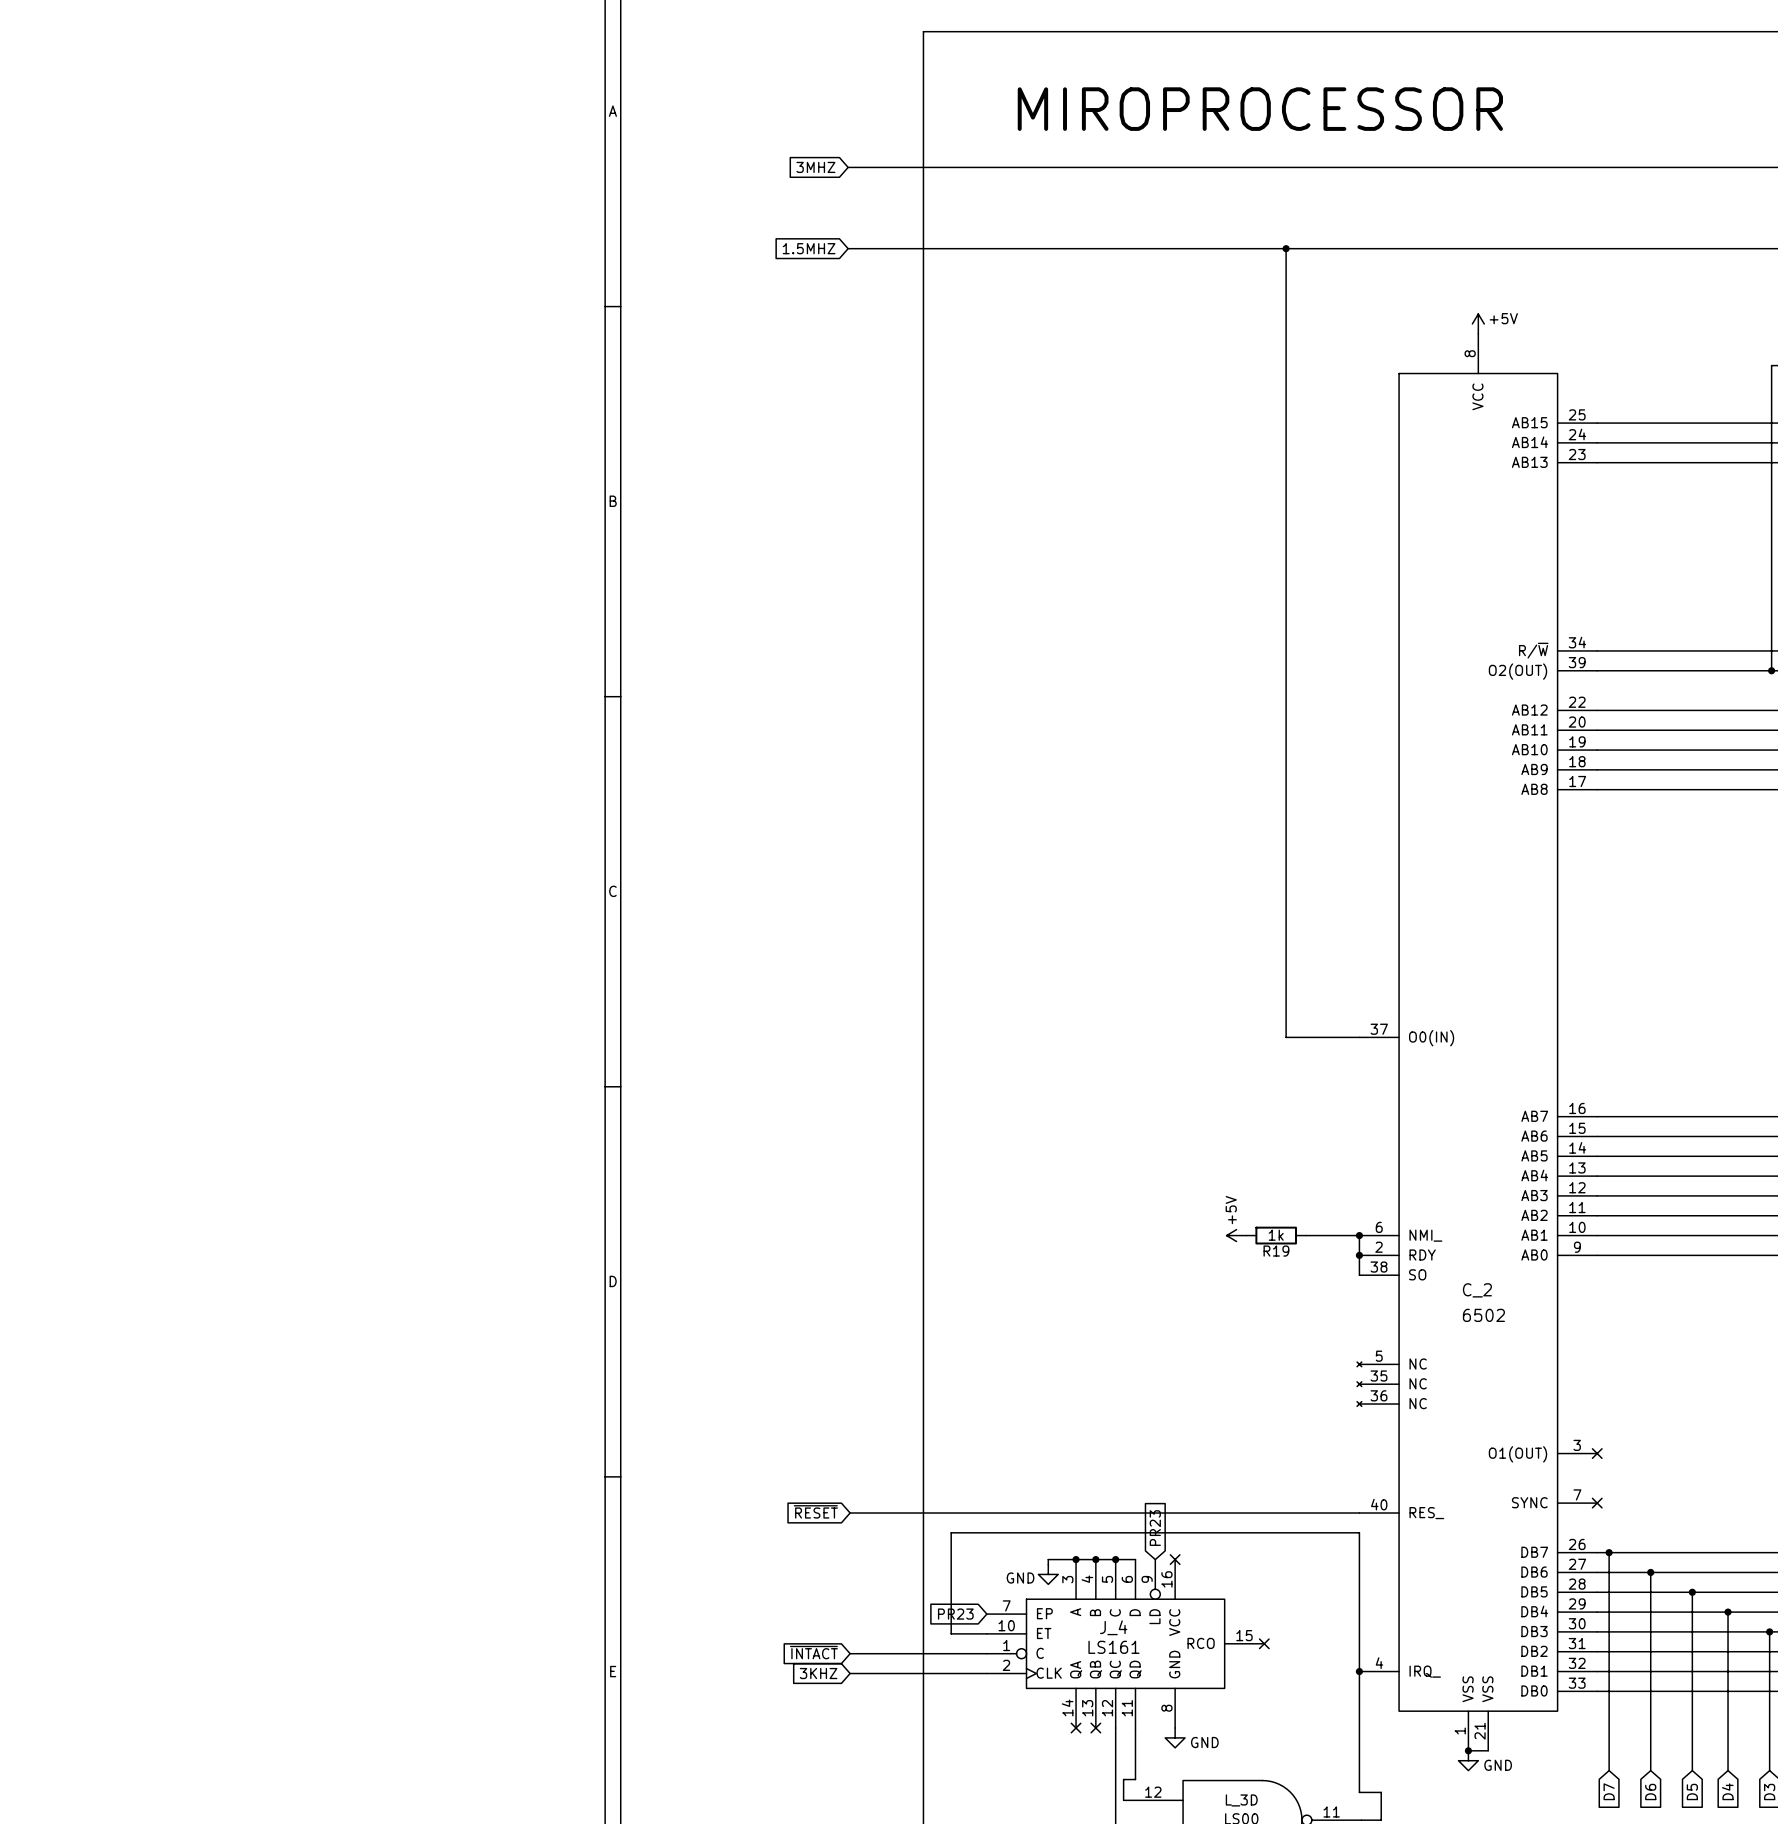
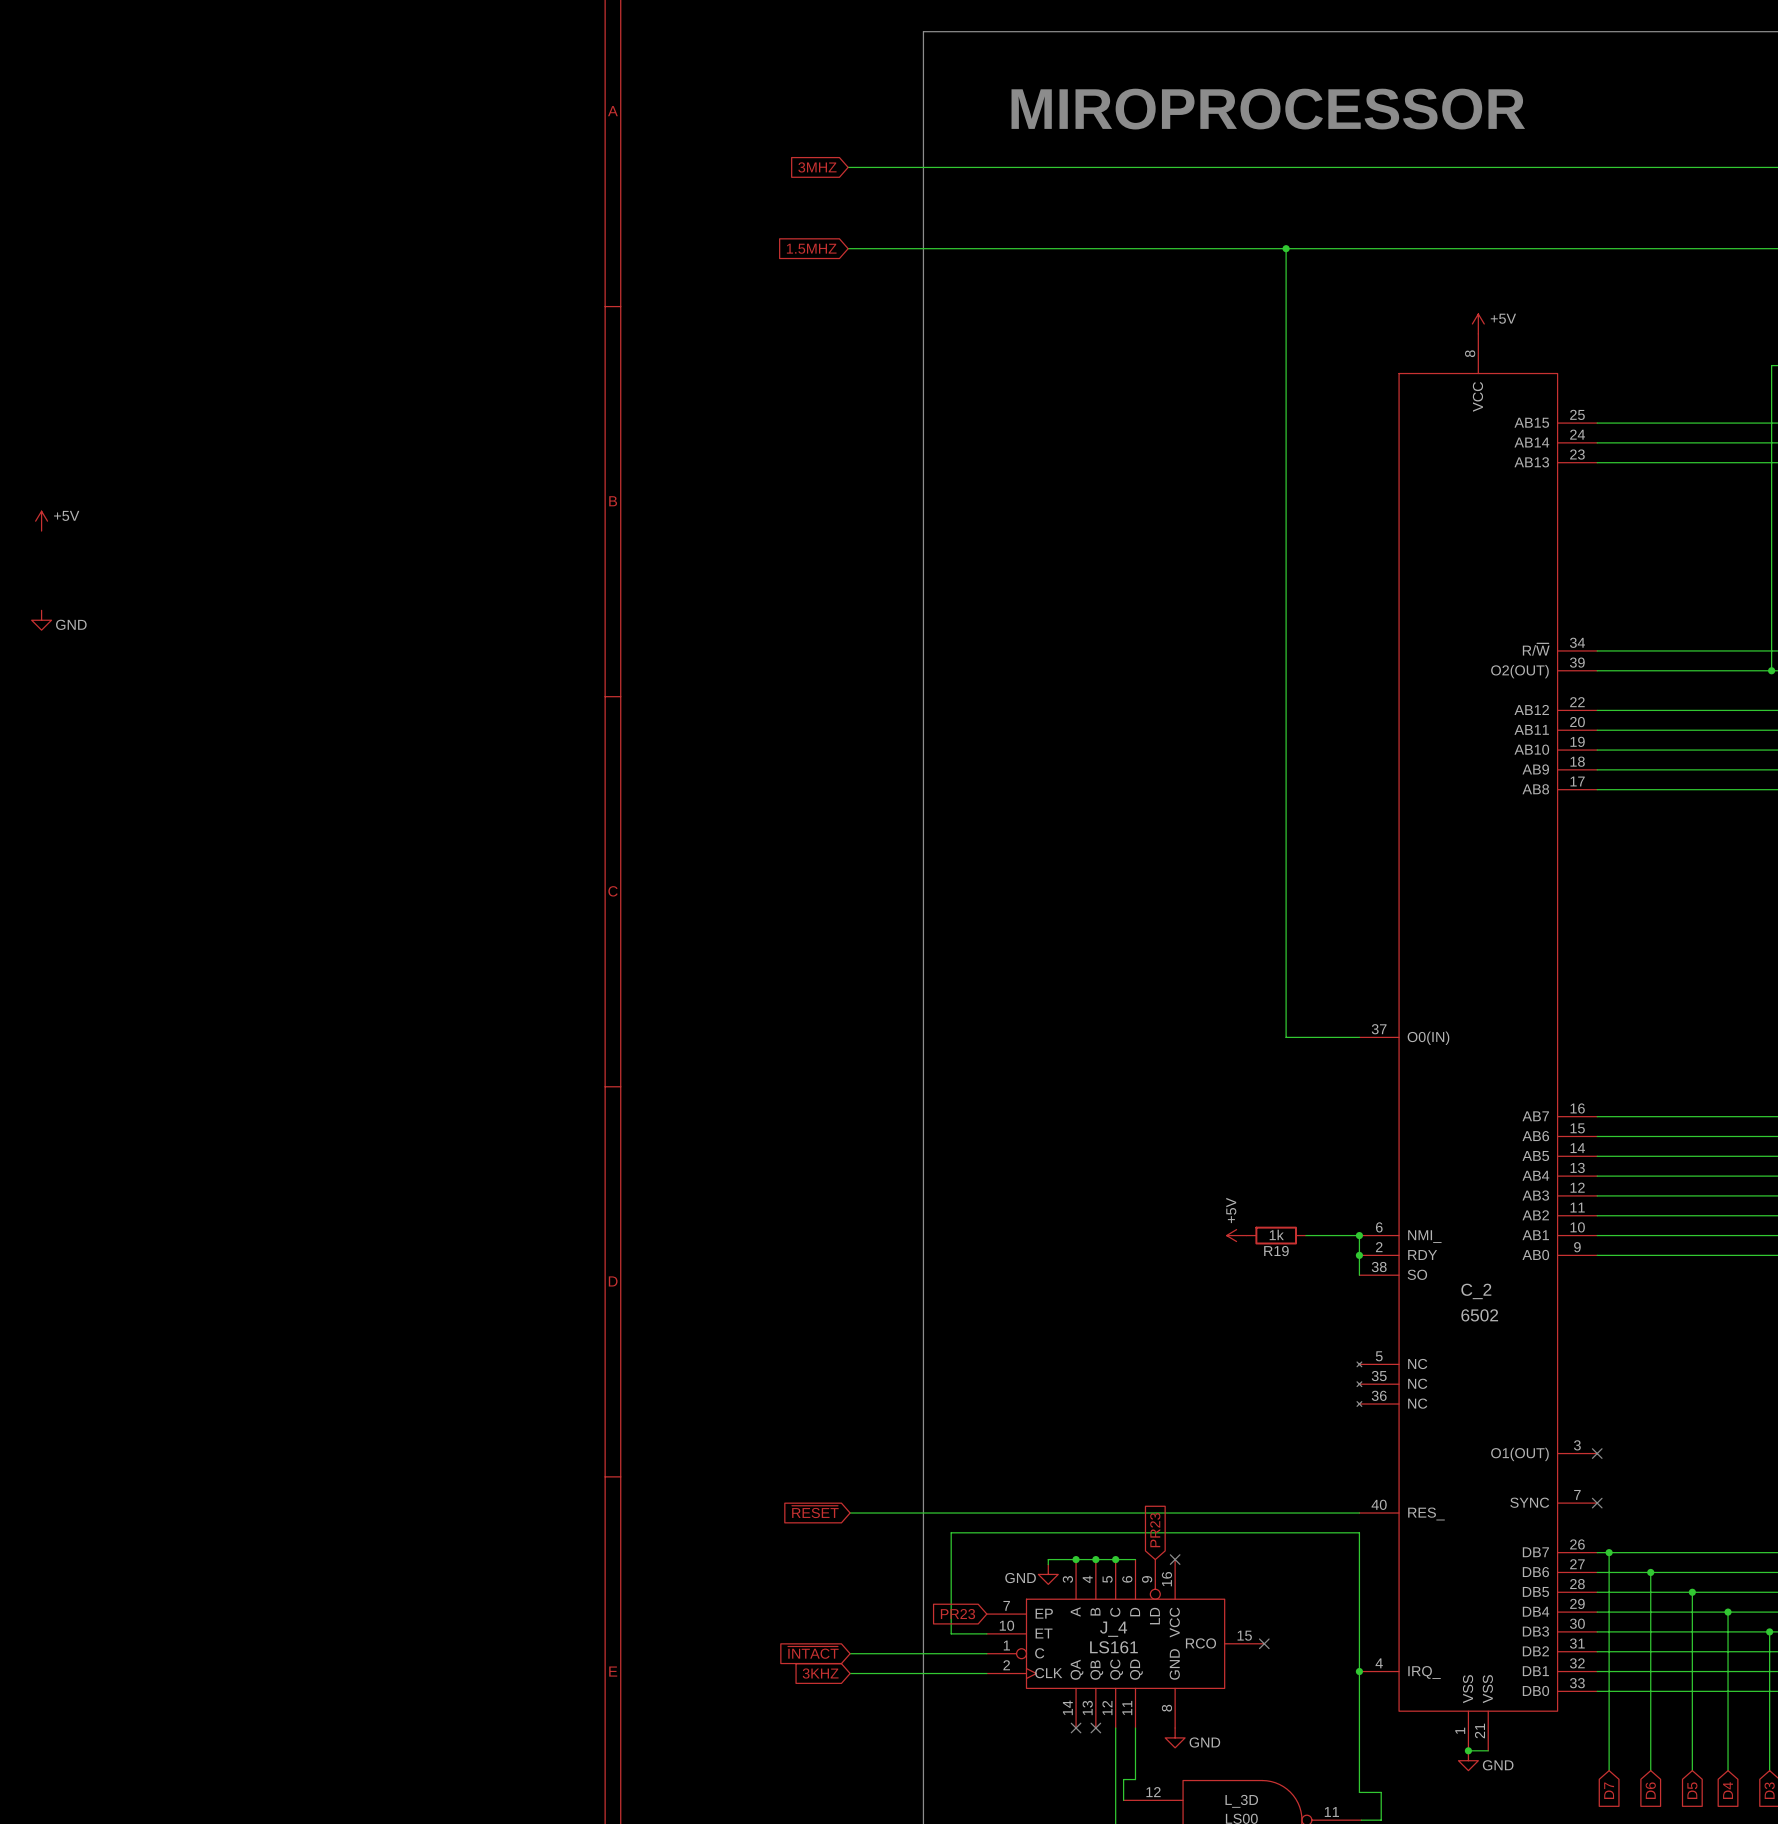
power symbol: none -> +5V (41, 521)
power symbol: none -> GND (41, 620)

